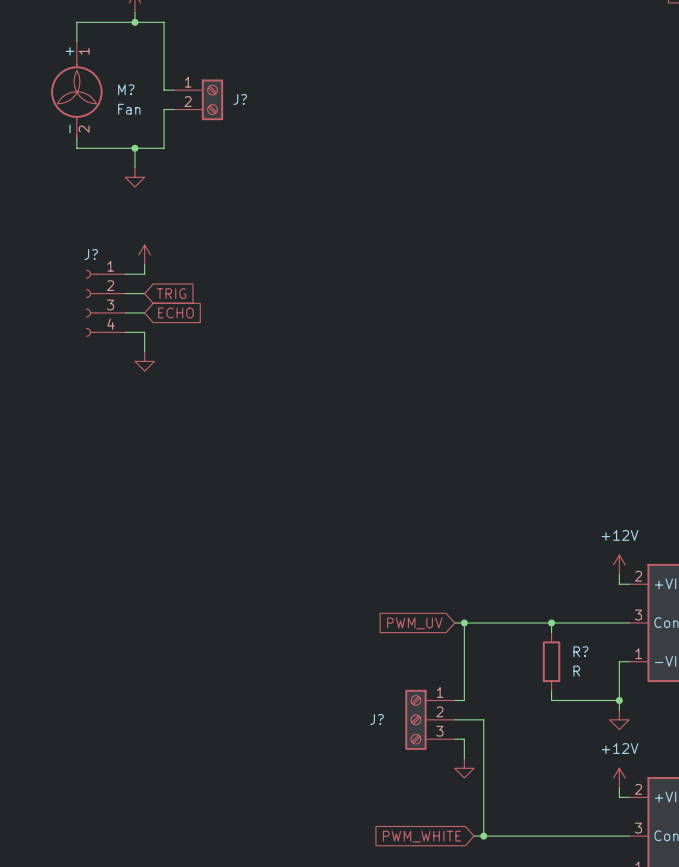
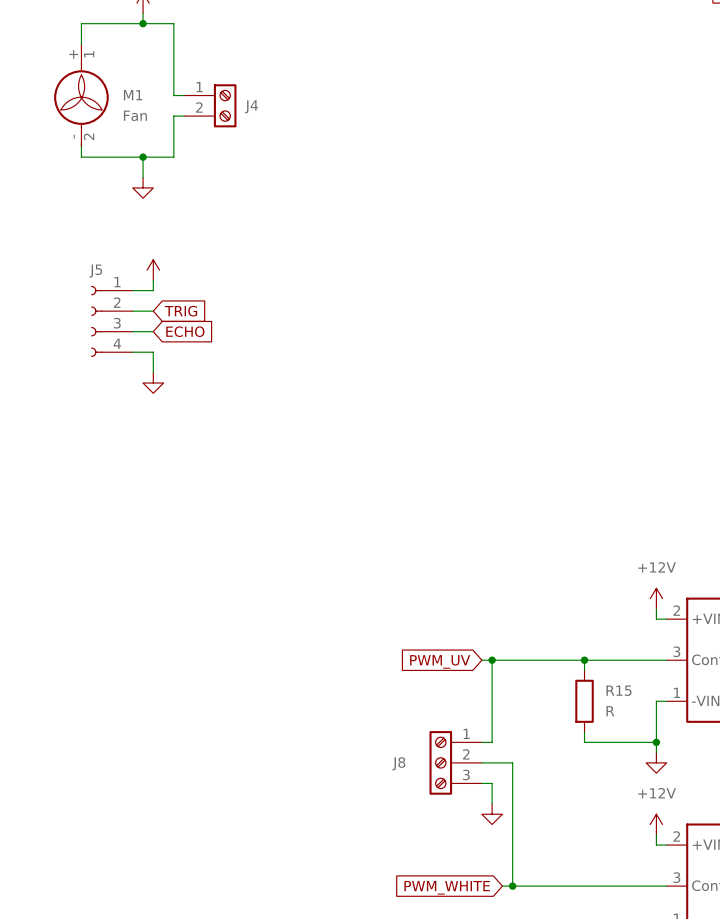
M? name: M? (126, 89) -> M1 (133, 95)
J? name: J? (240, 99) -> J4 (251, 106)
J? name: J? (91, 254) -> J5 (95, 271)
R? name: R? (580, 651) -> R15 (618, 690)
J? name: J? (376, 719) -> J8 (398, 763)

